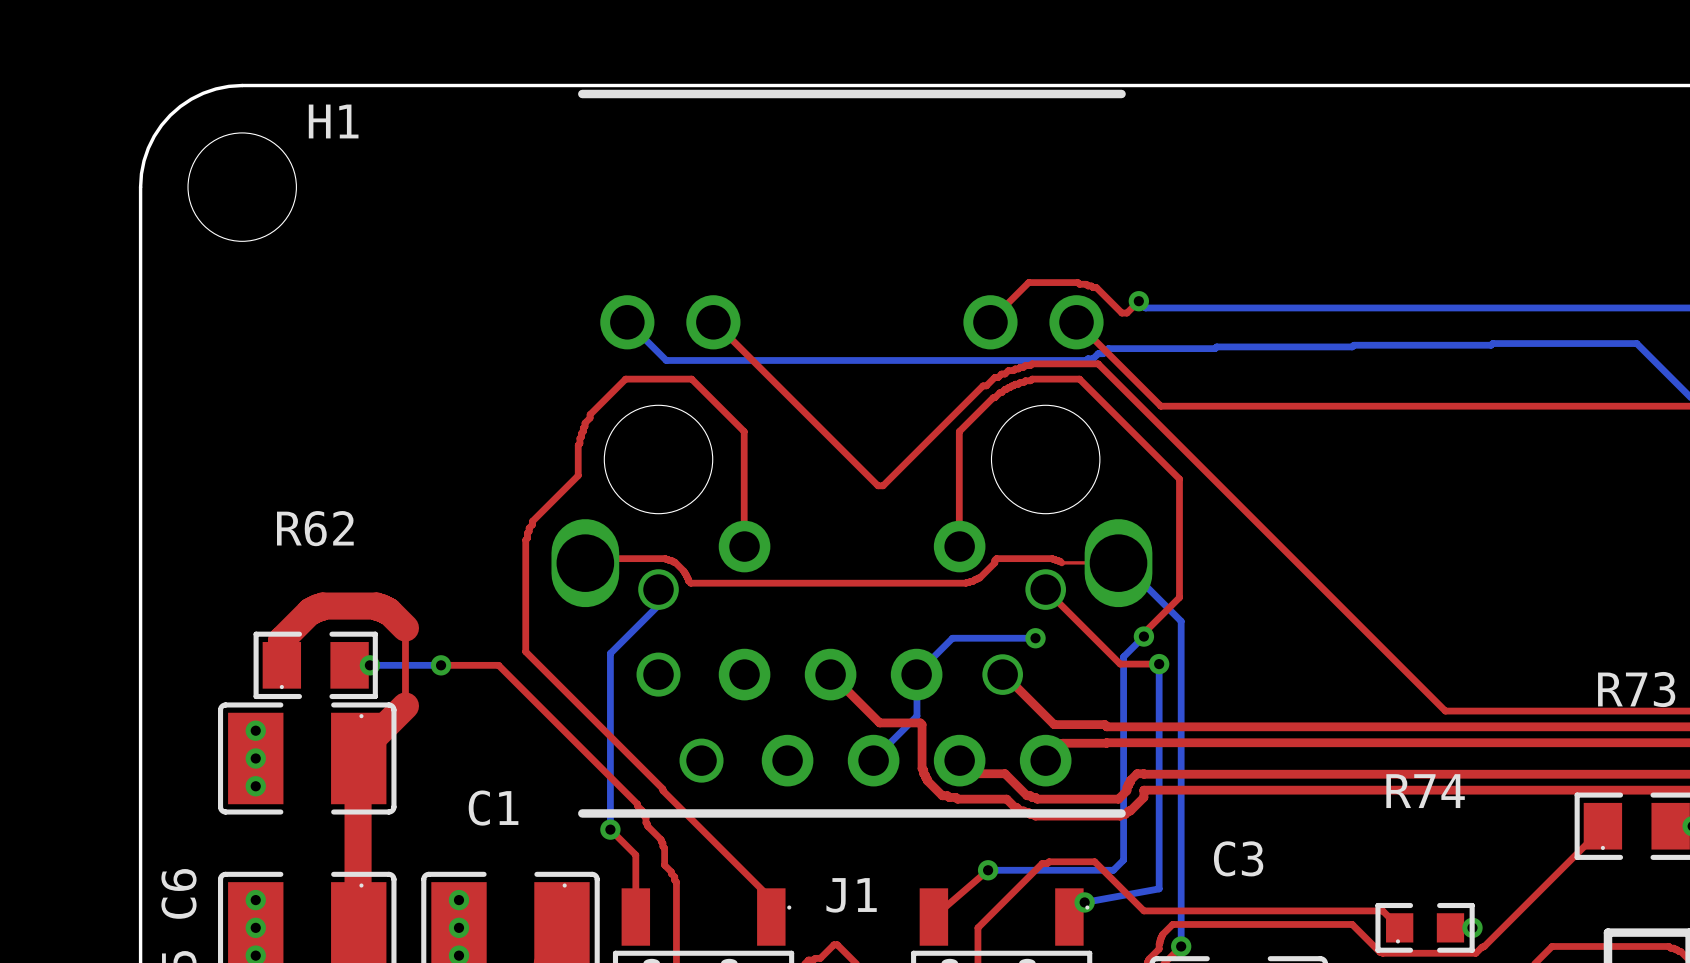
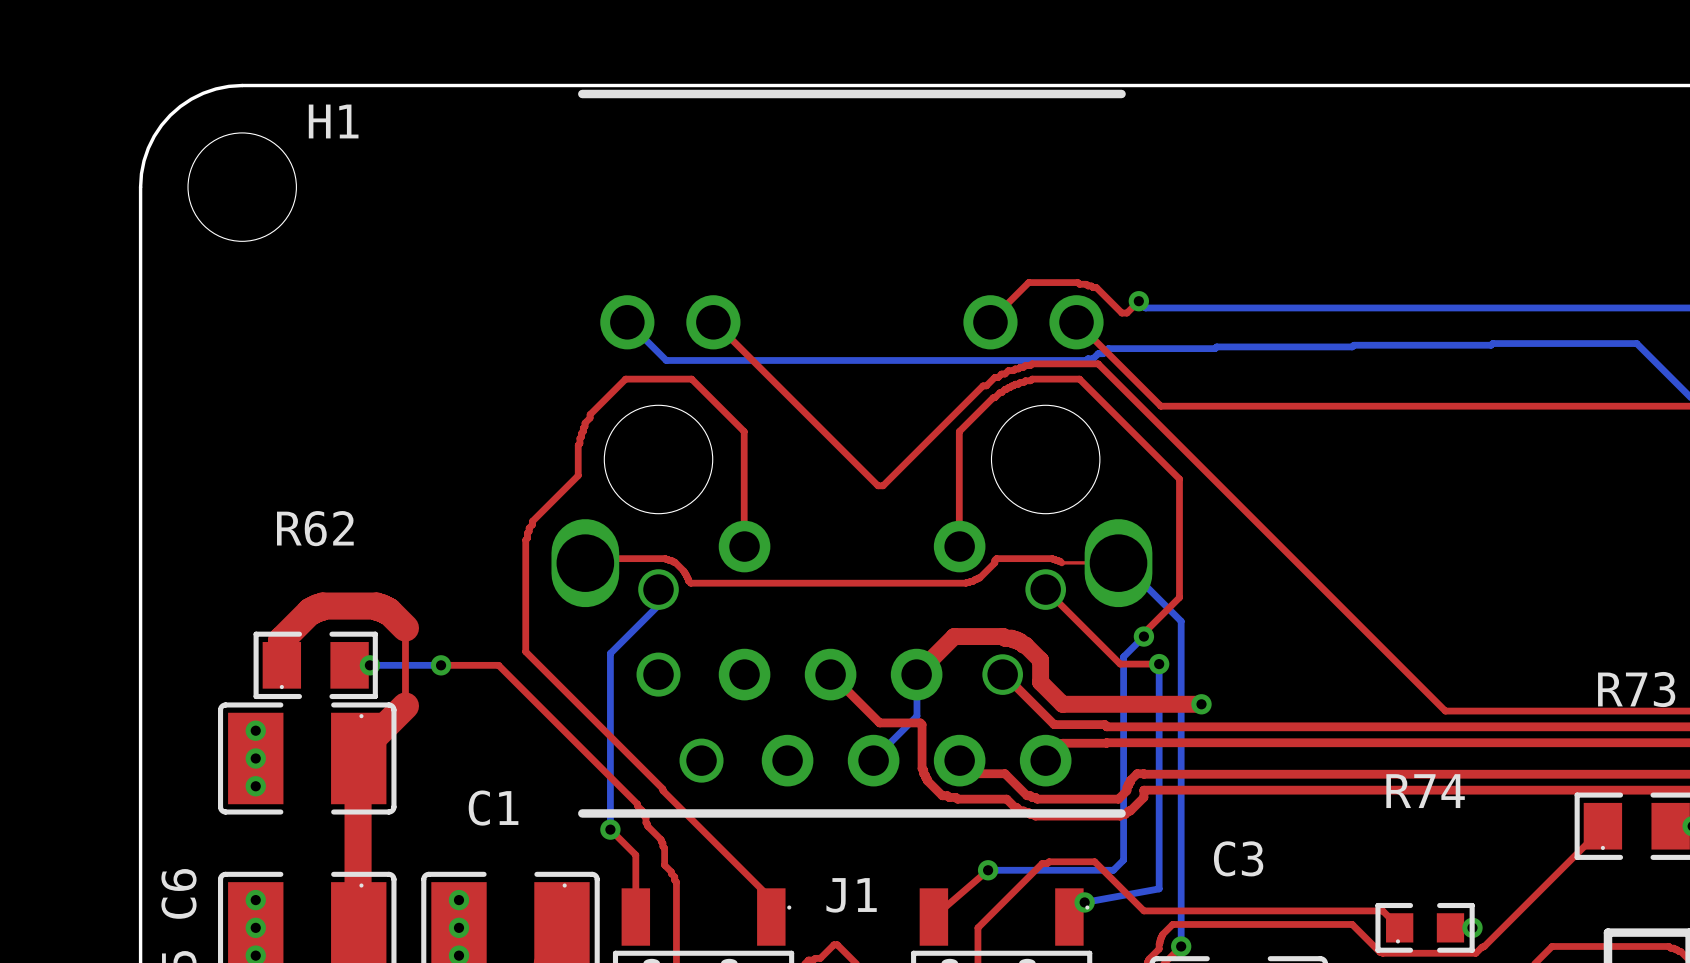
bottom track: (1035, 638) (952, 638) (916, 673) -> none
via position: (1035, 638) -> (1201, 704)
top track: none -> (916, 674) (954, 636) (1003, 636) (1020, 641) (1040, 660) (1040, 682) (1062, 704) (1201, 704)

